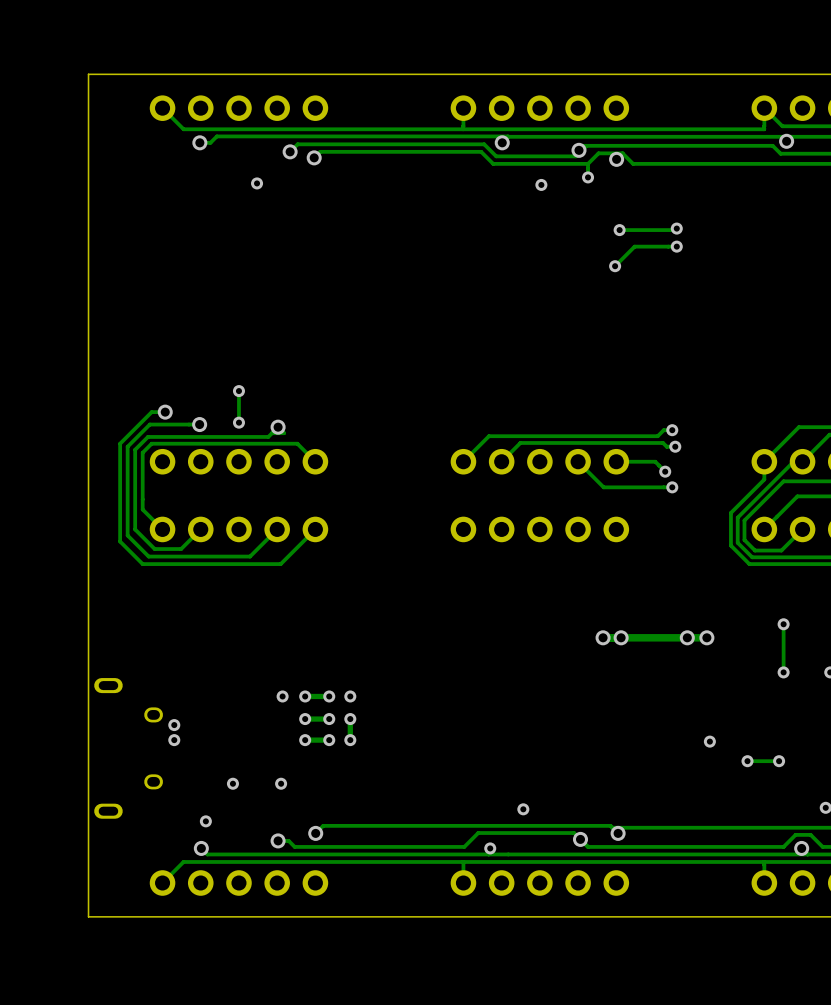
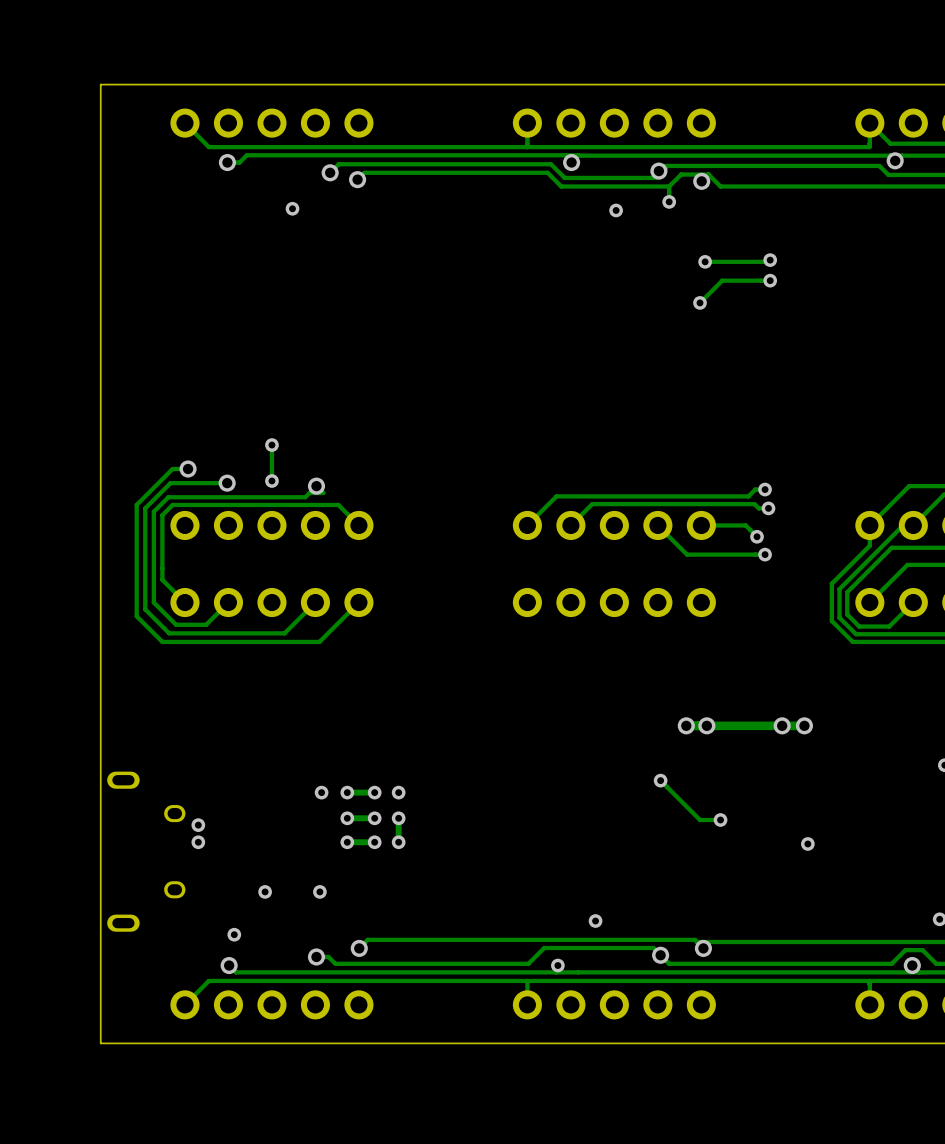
track: (783, 624) (783, 672) -> none
via: (783, 624) -> none
via: (783, 672) -> none
track: none -> (660, 780) (700, 820) (720, 820)
via: none -> (660, 780)
via: none -> (720, 820)
via: (747, 761) -> none
track: (779, 761) (747, 761) -> none
via: (779, 761) -> none

